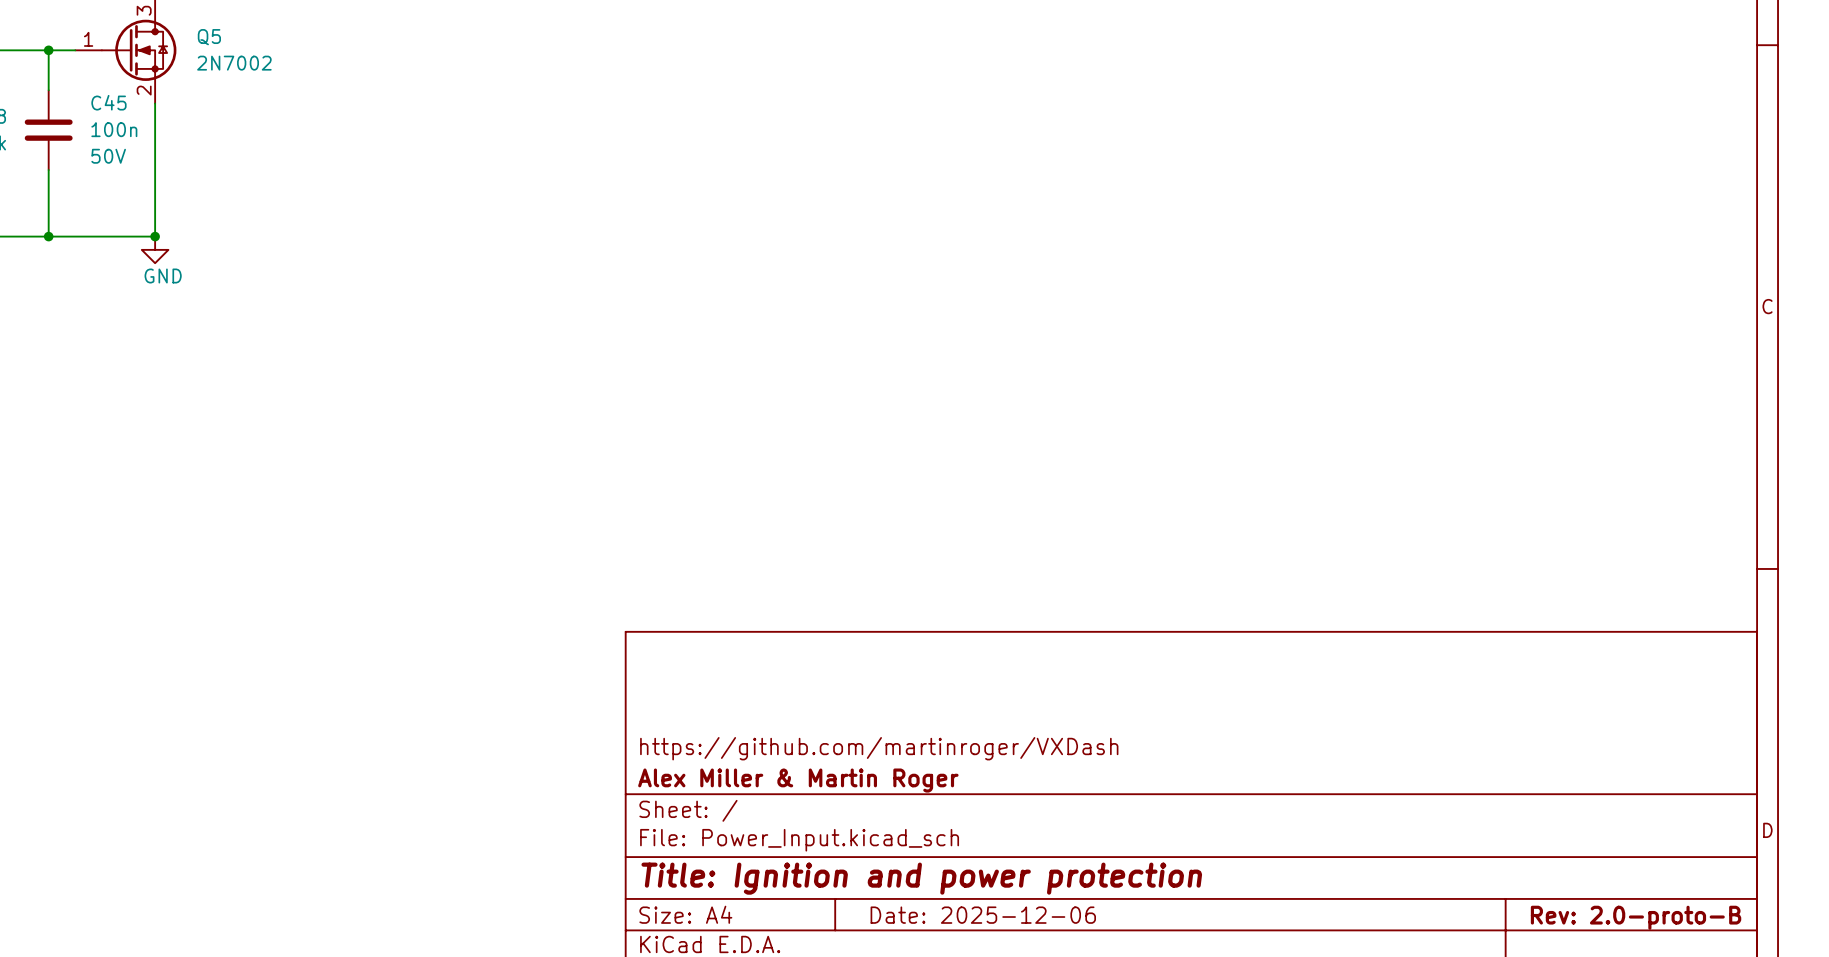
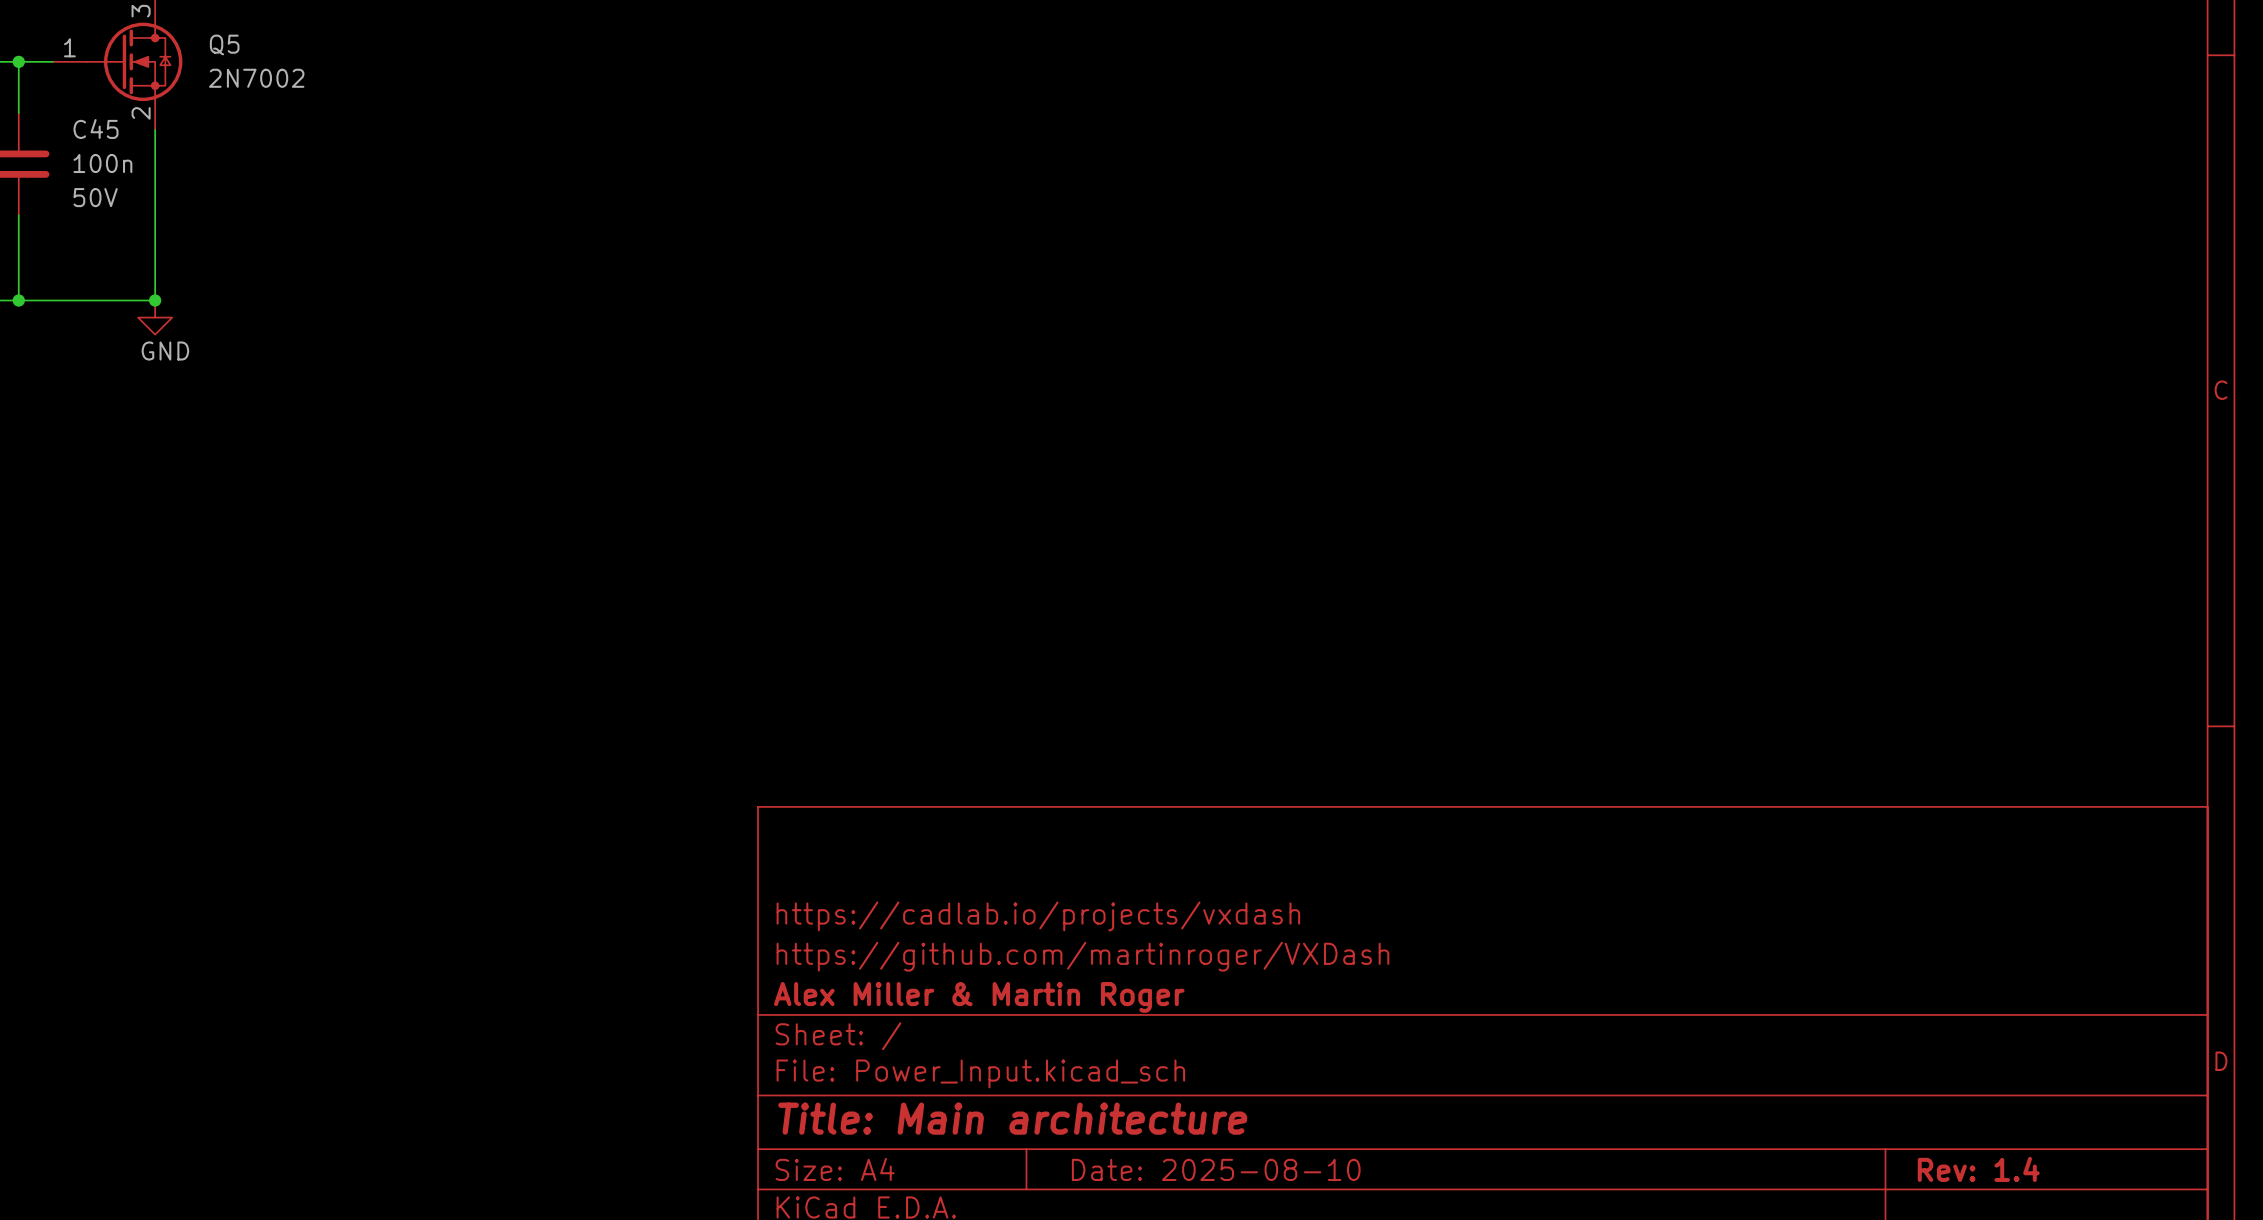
title block: none -> https://cadlab.io/projects/vxdash (1038, 916)
title block: Title: Ignition and power protection (921, 878) -> Title: Main architecture (1012, 1118)
title block: Date: 2025-12-06 (983, 915) -> Date: 2025-08-10 (1216, 1169)
title block: Rev: 2.0-proto-B (1636, 917) -> Rev: 1.4 (1978, 1169)

